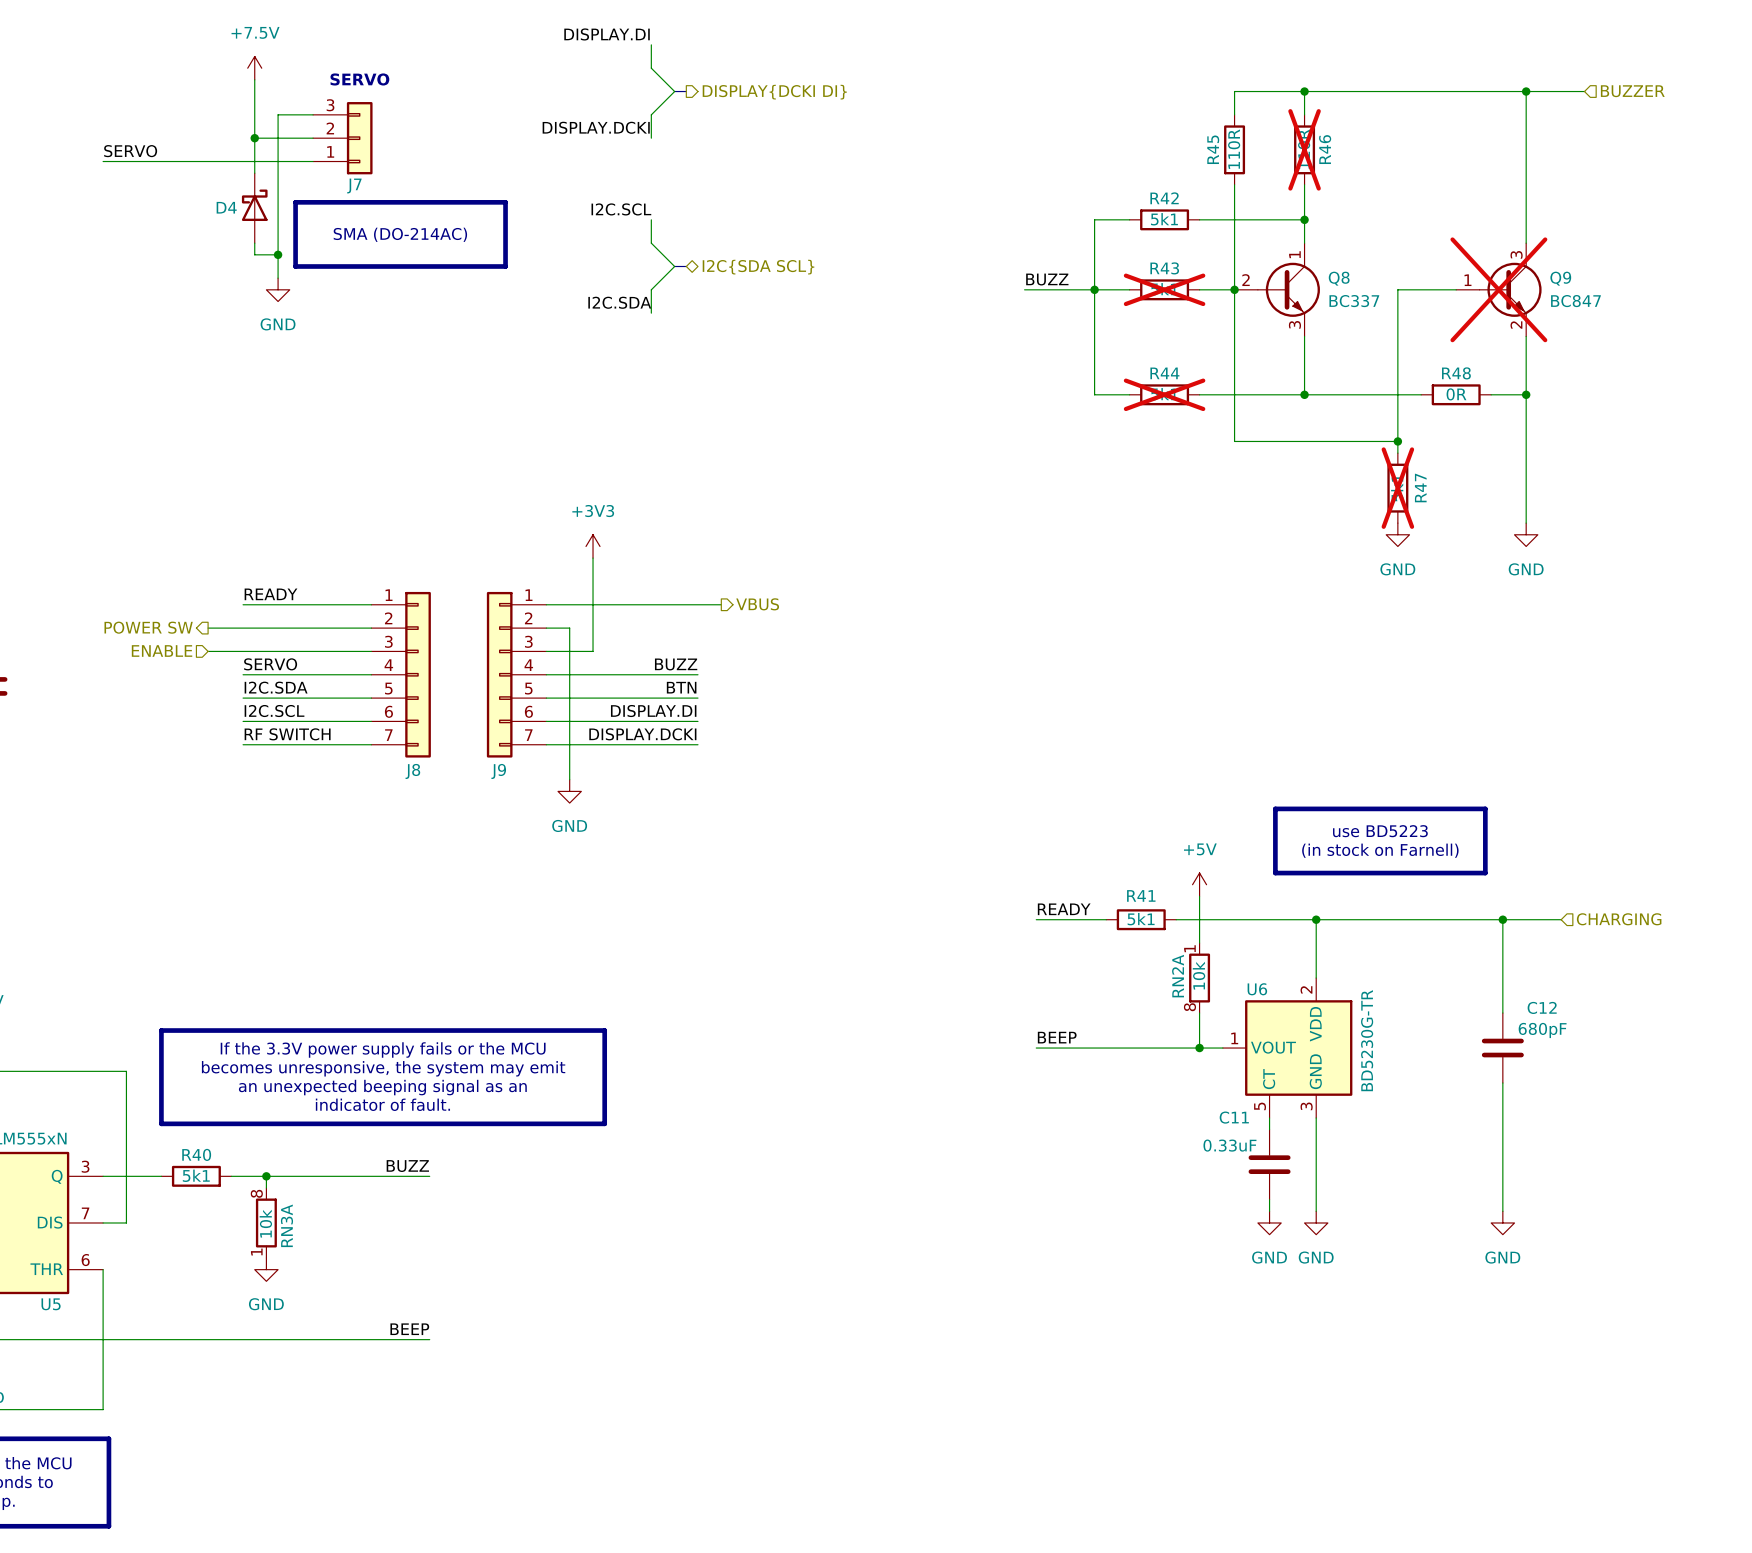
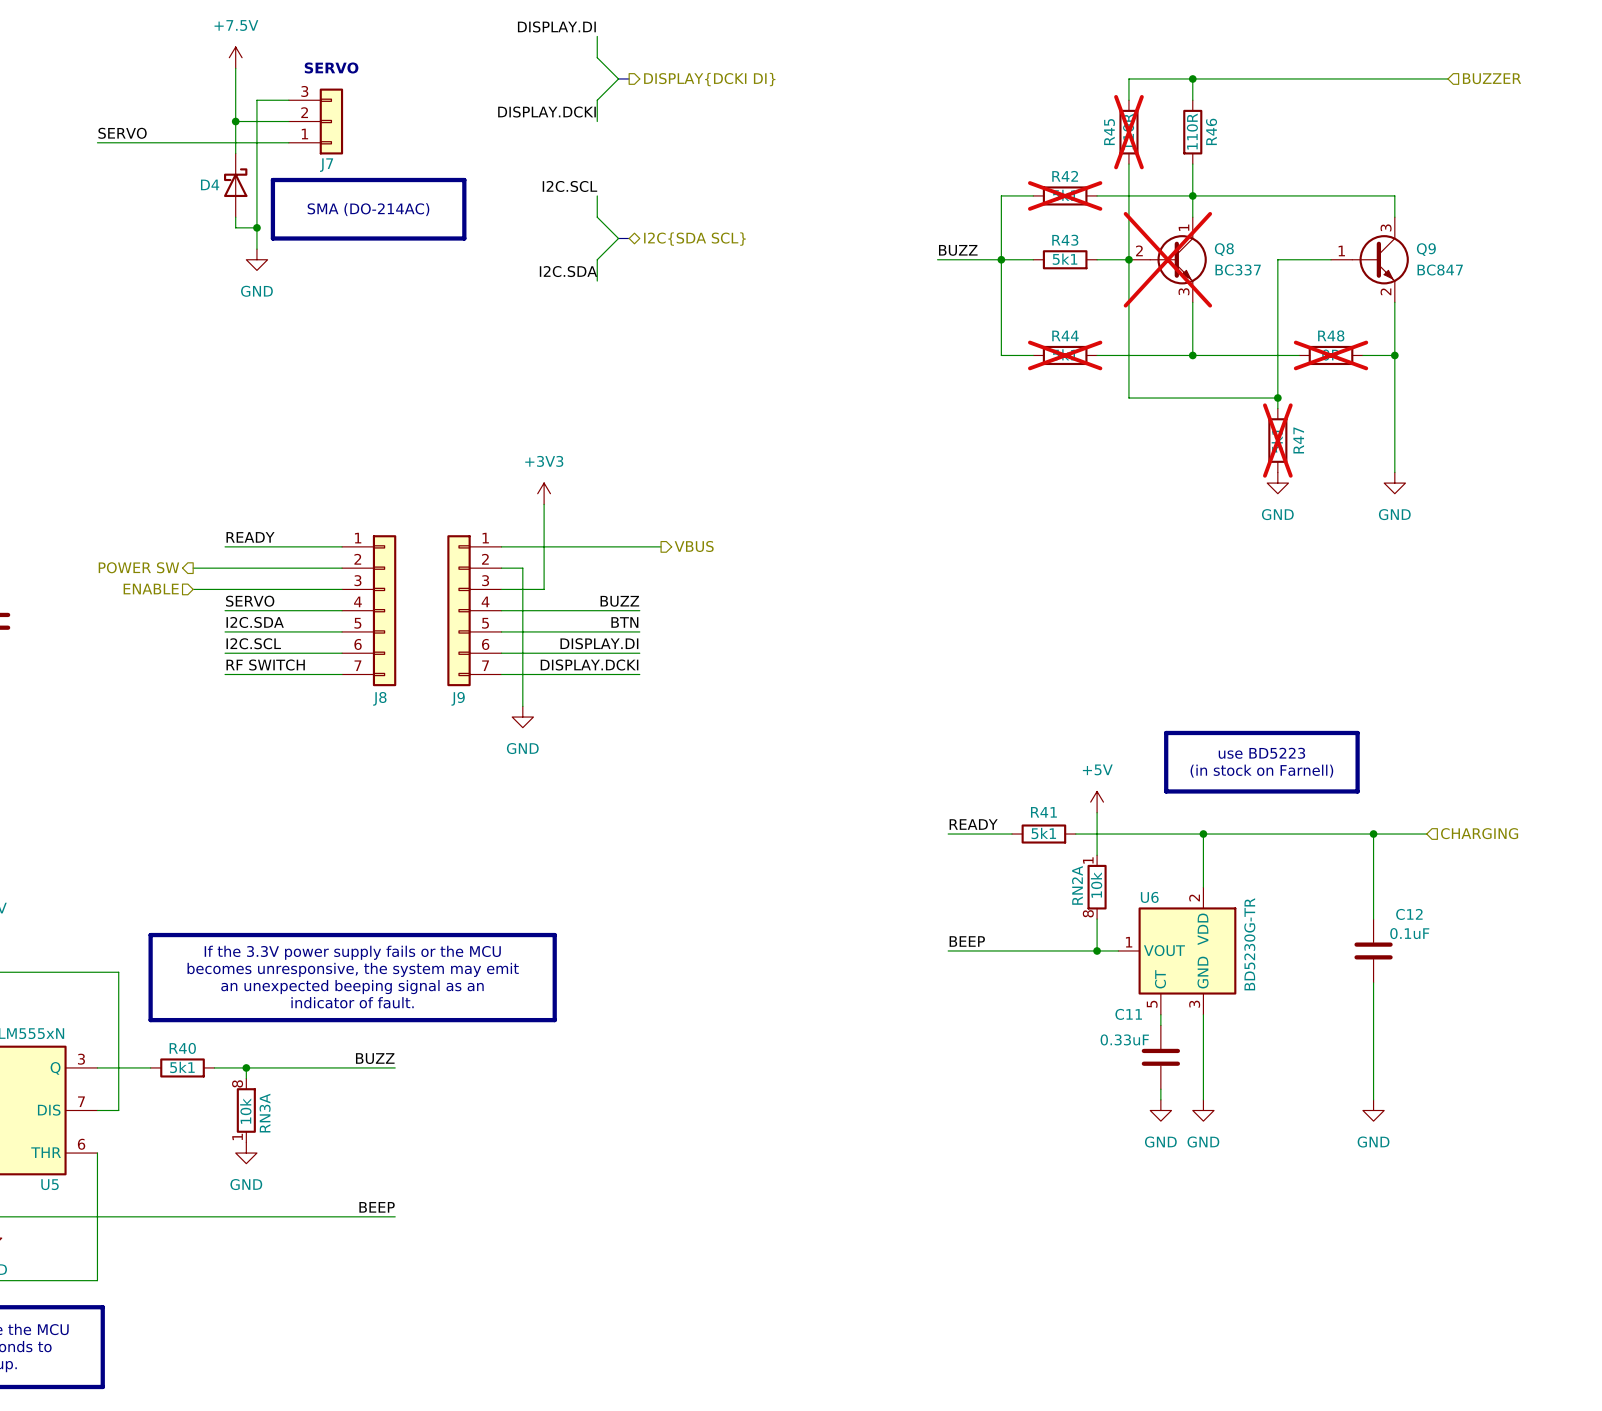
wire: (1526, 91) (1526, 219) -> (1192, 195) (1394, 195)
junction: (1526, 91) -> none
R45 do-not-place cross: none -> (1128, 132)
R46 do-not-place cross: (1304, 149) -> none
R42 do-not-place cross: none -> (1065, 195)
R43 do-not-place cross: (1164, 289) -> none
Q8 do-not-place cross: none -> (1167, 259)
Q9 do-not-place cross: (1498, 289) -> none
R48 do-not-place cross: none -> (1331, 355)
C12 value: 680pF (1542, 1030) -> 0.1uF (1409, 933)

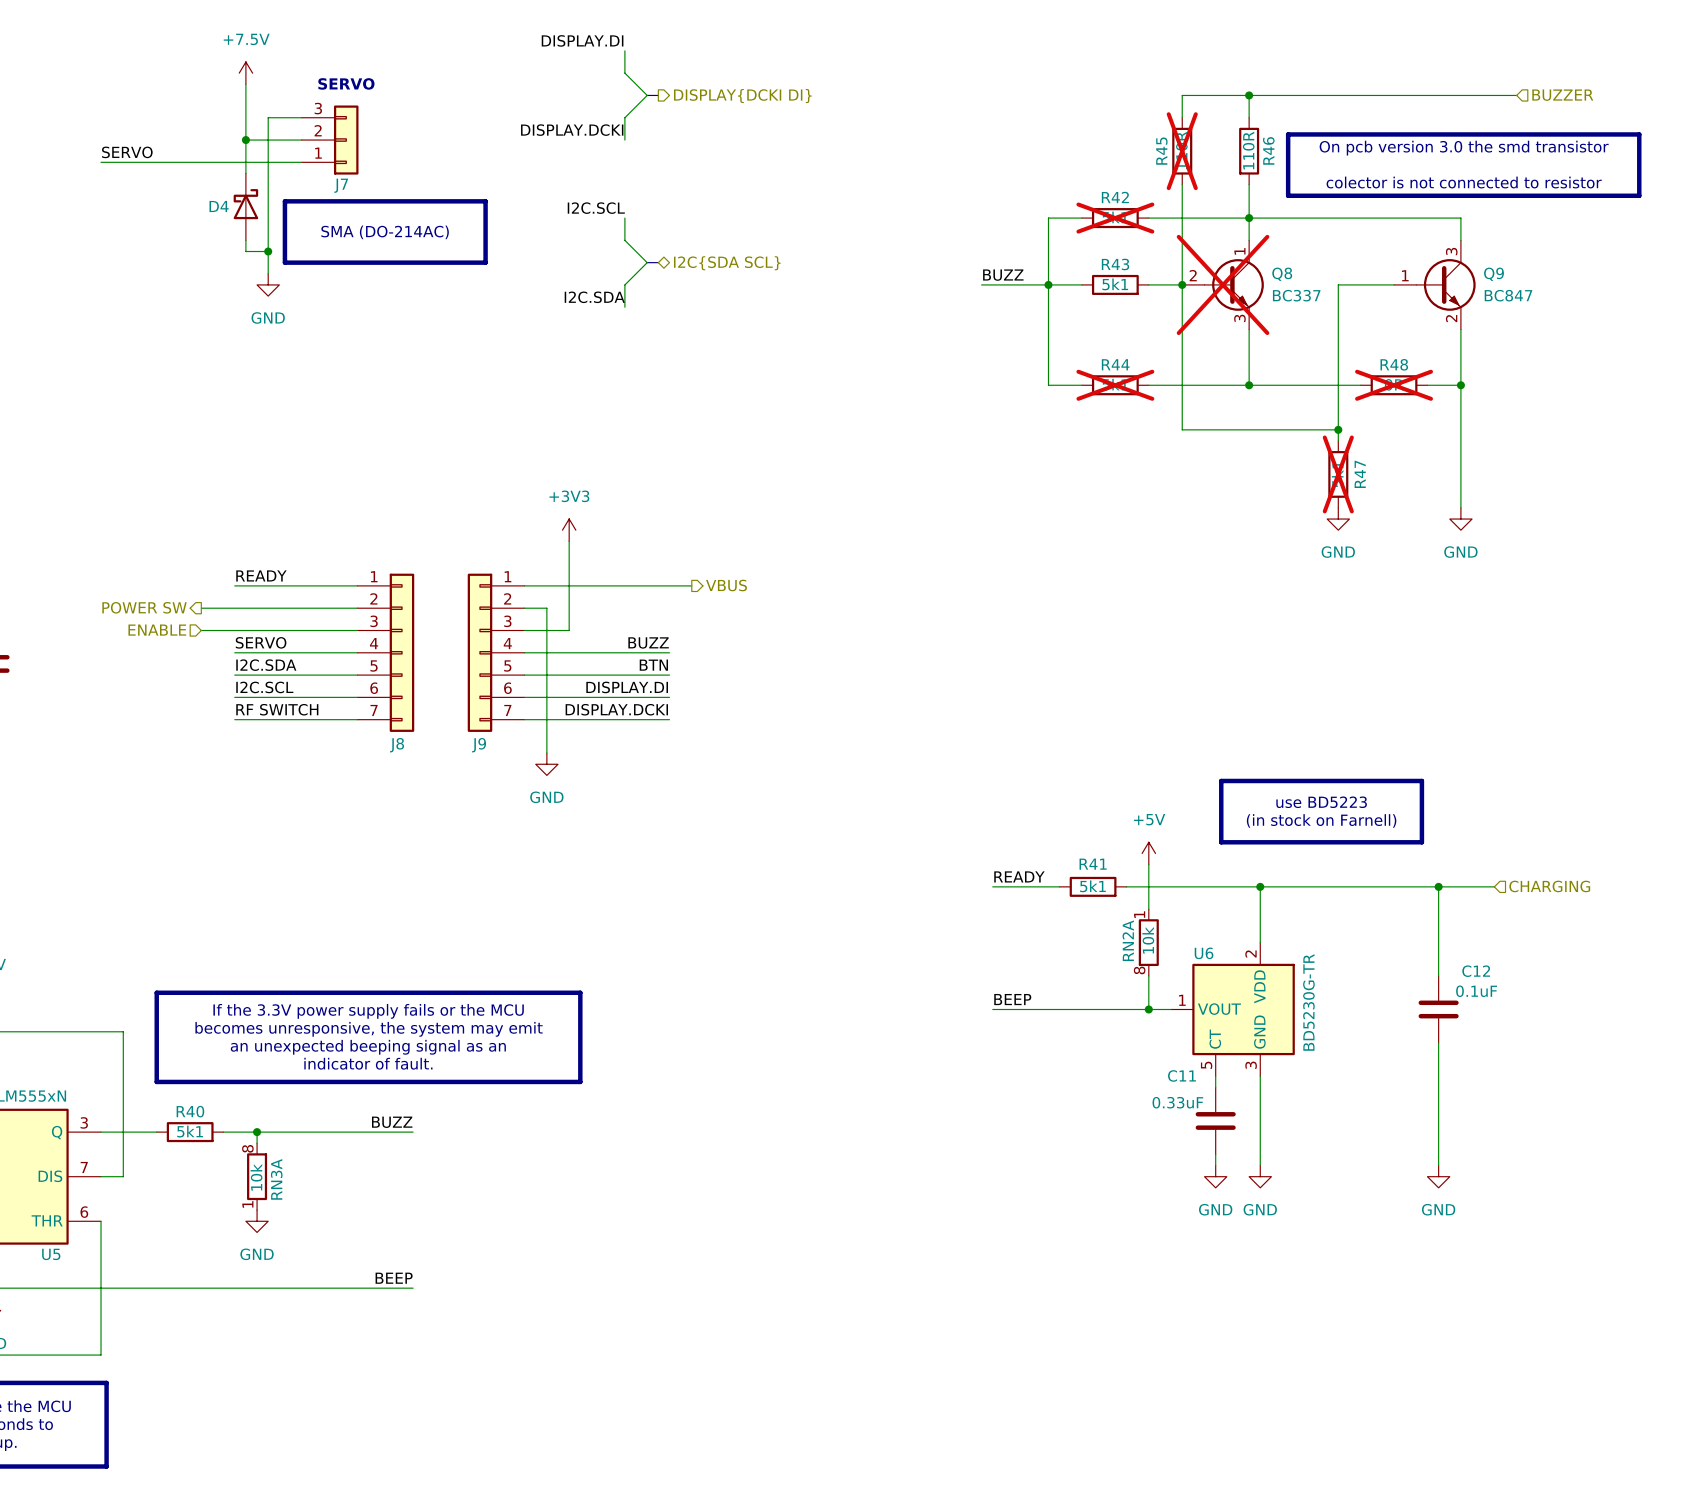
line: none -> (1288, 134) (1639, 134) (1639, 195) (1288, 195) (1288, 134)
text: none -> On pcb version 3.0 the smd transistor (1464, 148)
text: none -> colector is not connected to resistor (1464, 182)

